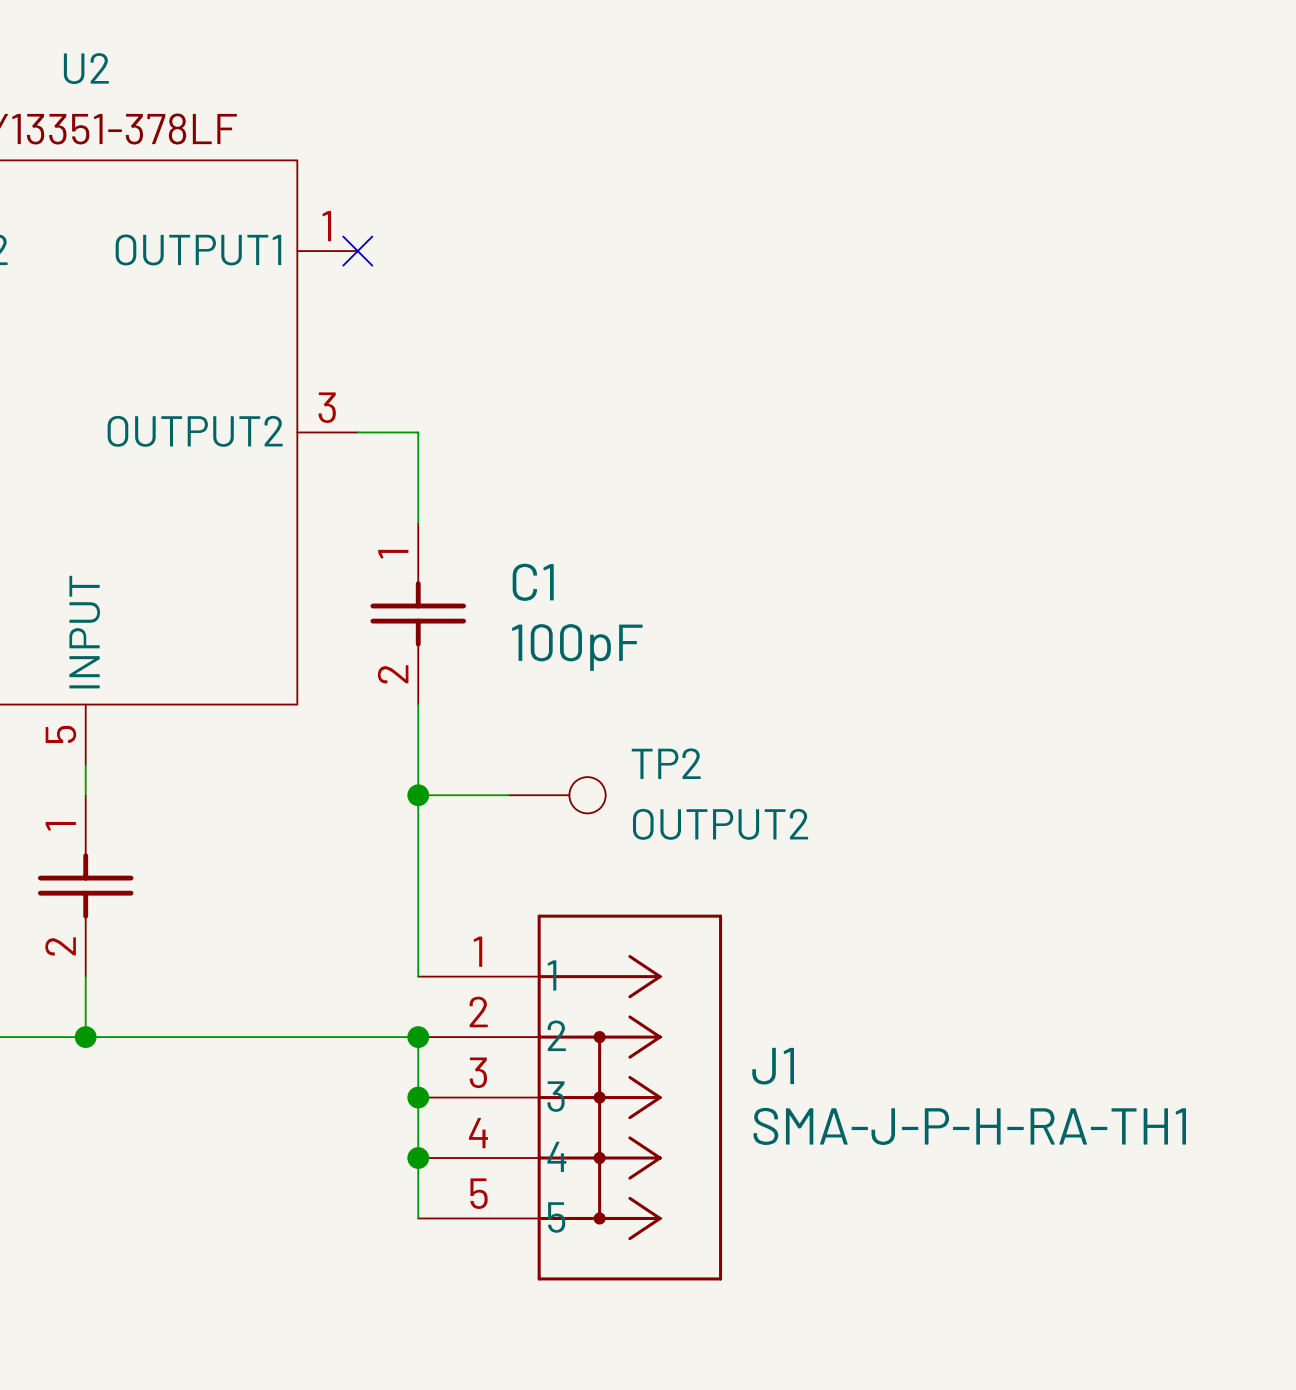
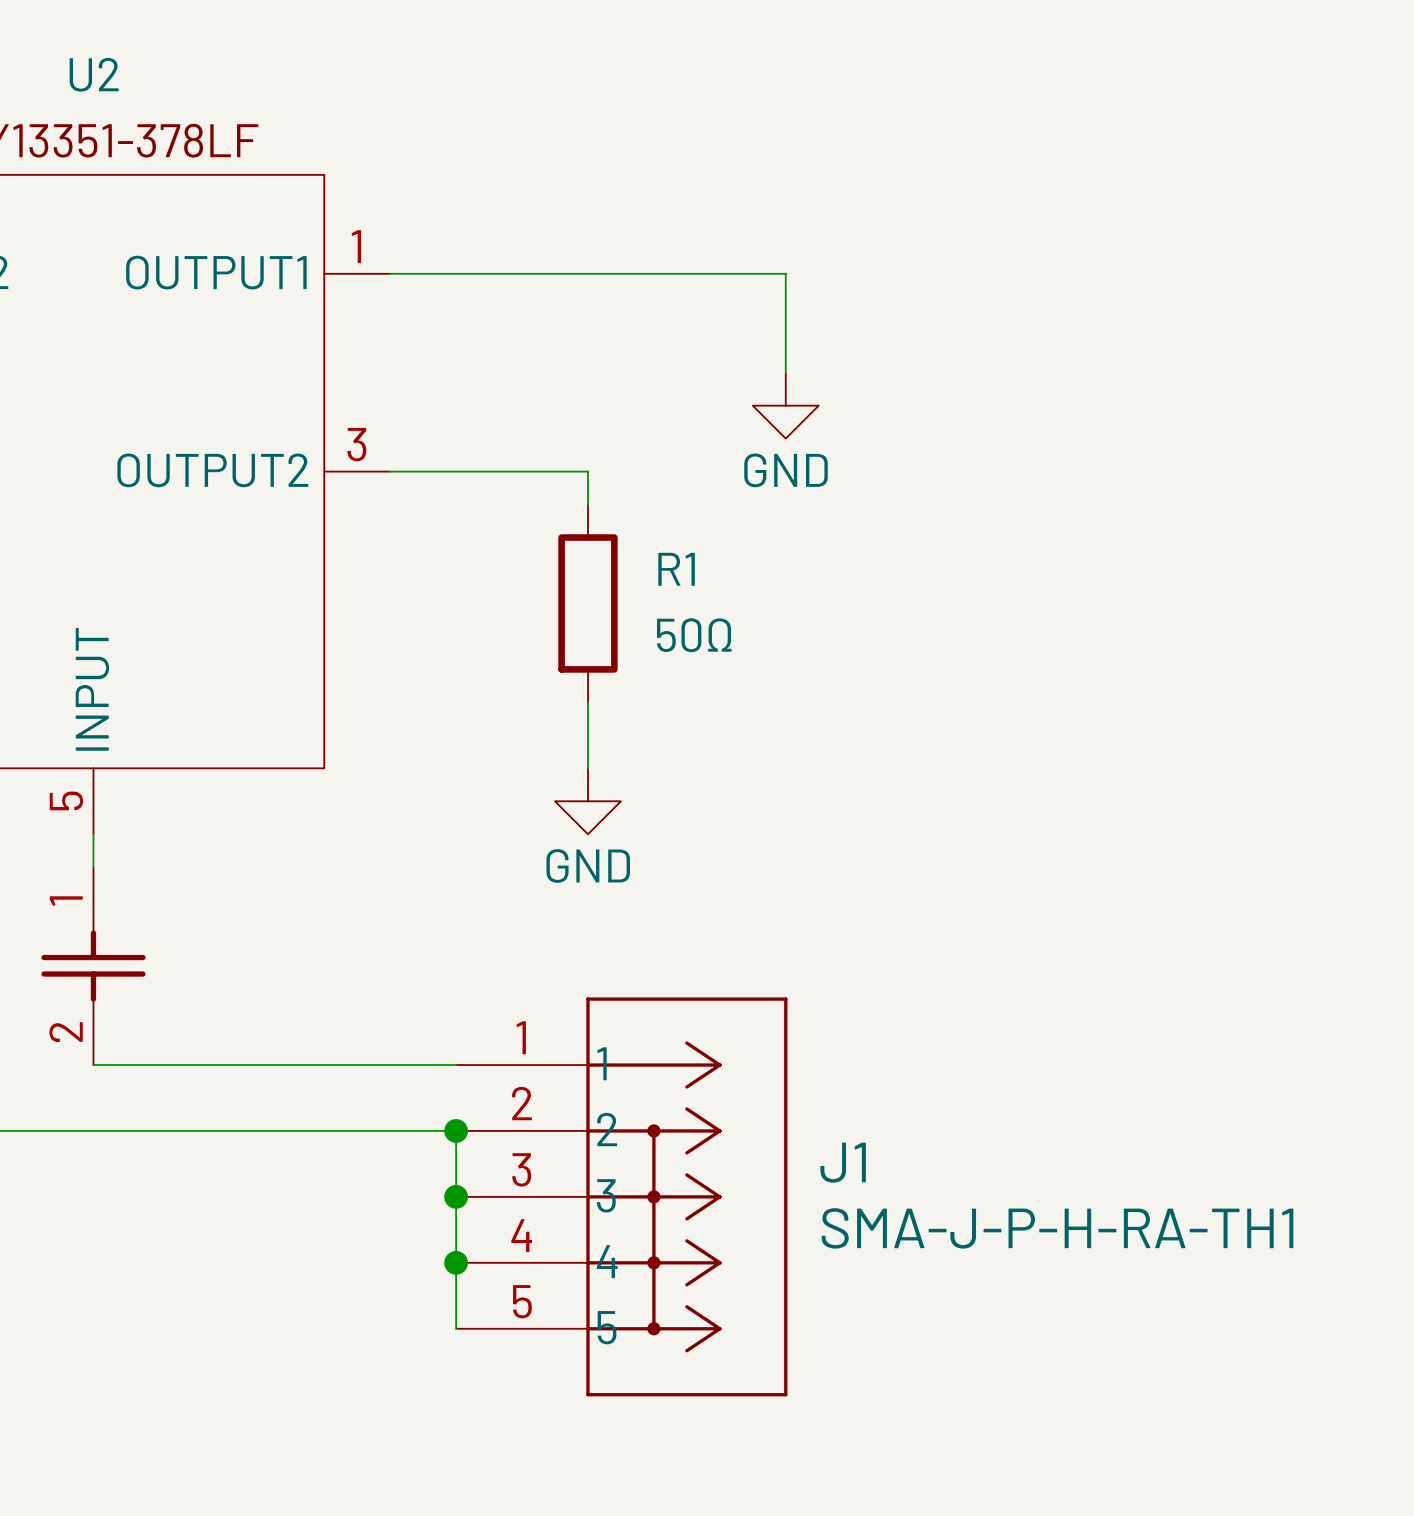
wire: none -> (390, 273) (785, 273) (785, 372)
no-connect mark: (357, 251) -> none
power symbol: none -> GND (785, 405)
wire: (418, 432) (418, 523) -> (456, 471) (587, 471) (587, 504)
R1: none -> 50Ω (587, 603)
C1: 100pF (418, 613) -> none
wire: none -> (587, 702) (587, 768)
wire: (418, 704) (418, 976) -> none
power symbol: none -> GND (587, 801)
wire: (418, 795) (508, 795) -> none
junction: (418, 795) -> none
TP2: OUTPUT2 (557, 795) -> none
wire: (85, 976) (85, 1037) -> (93, 1065) (456, 1065)
junction: (85, 1037) -> none

